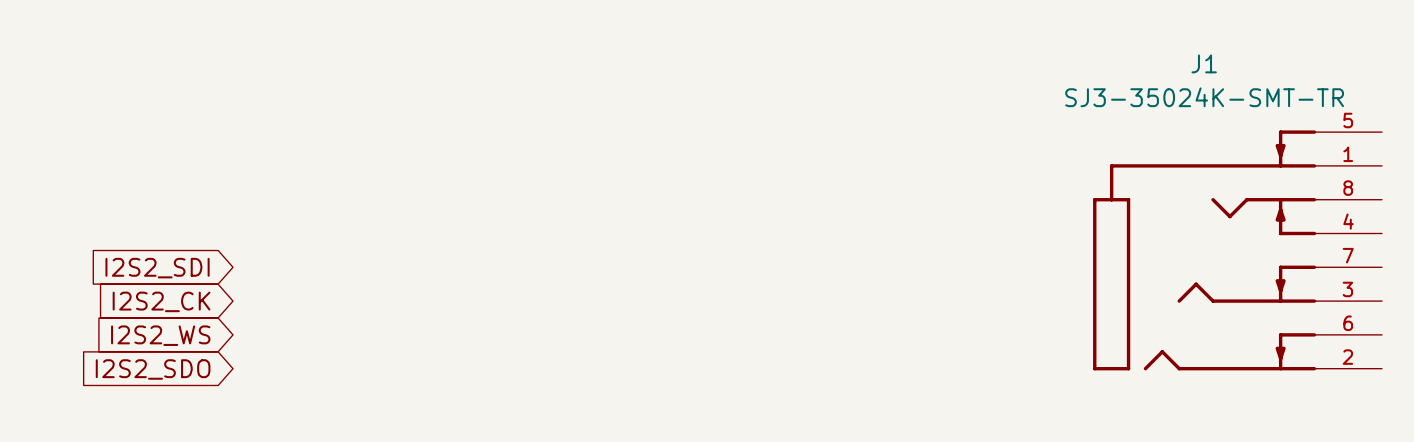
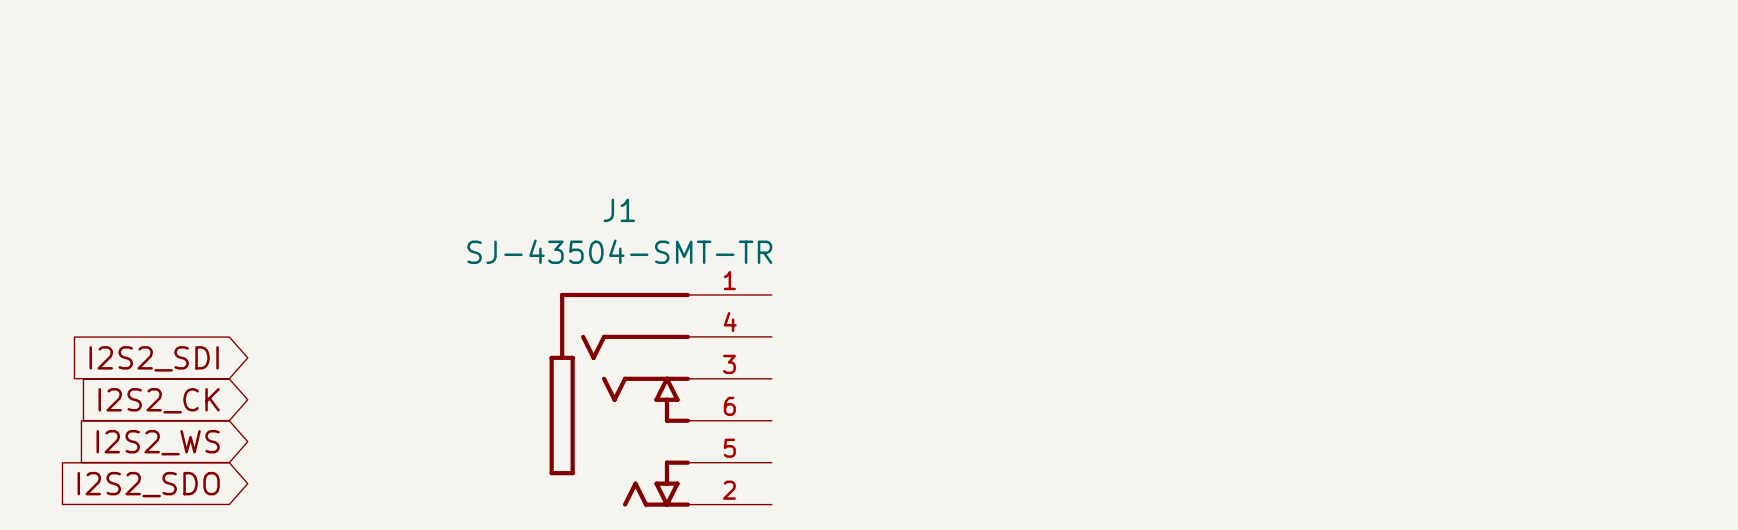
J1 name position: J1 (1204, 63) -> J1 (619, 210)
J1 value: SJ3-35024K-SMT-TR (1204, 97) -> SJ-43504-SMT-TR (619, 251)
J1 symbol: [1093, 130, 1383, 371] -> [549, 292, 772, 507]

